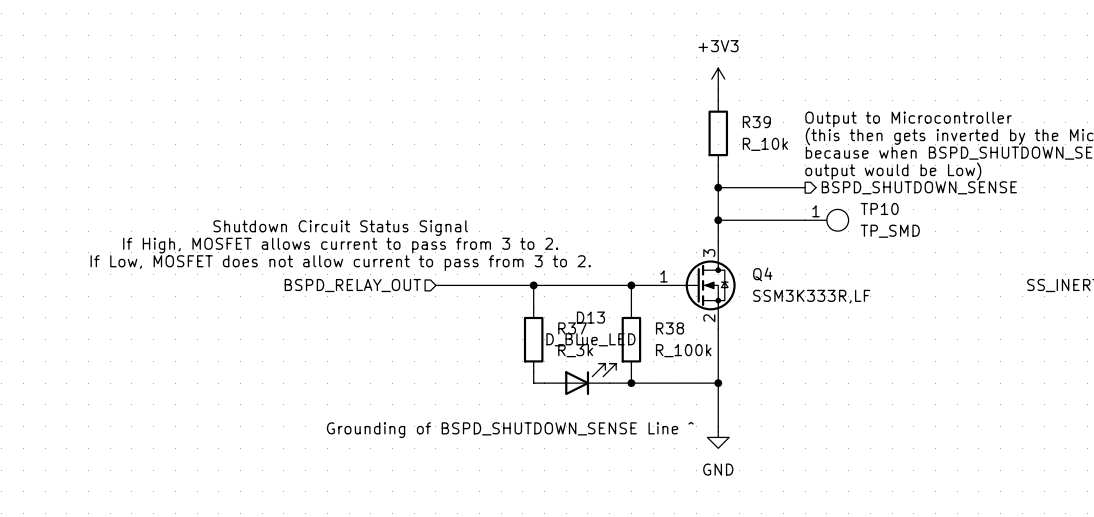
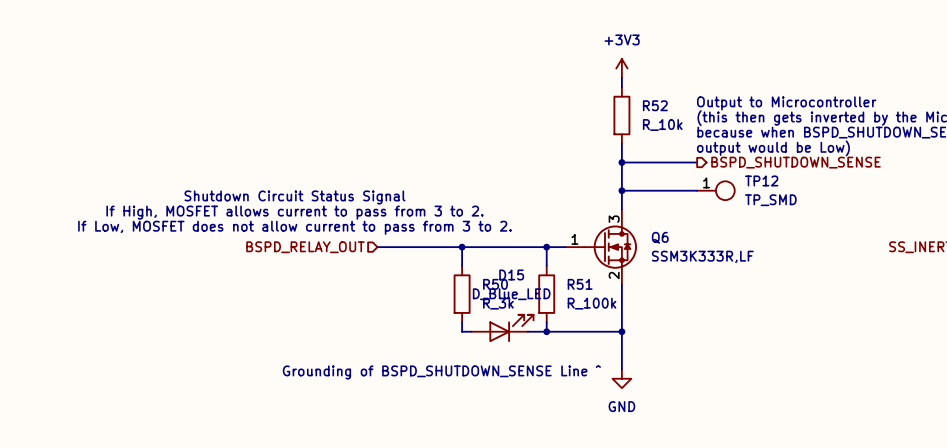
R39 name: R39 (756, 122) -> R52 (655, 105)
TP10 name: TP10 (879, 208) -> TP12 (761, 180)
Q4 name: Q4 (762, 274) -> Q6 (660, 237)
D13 name: D13 (590, 317) -> D15 (511, 274)
R37 name: R37 (572, 328) -> R50 (495, 284)
R38 name: R38 (670, 328) -> R51 (580, 284)

